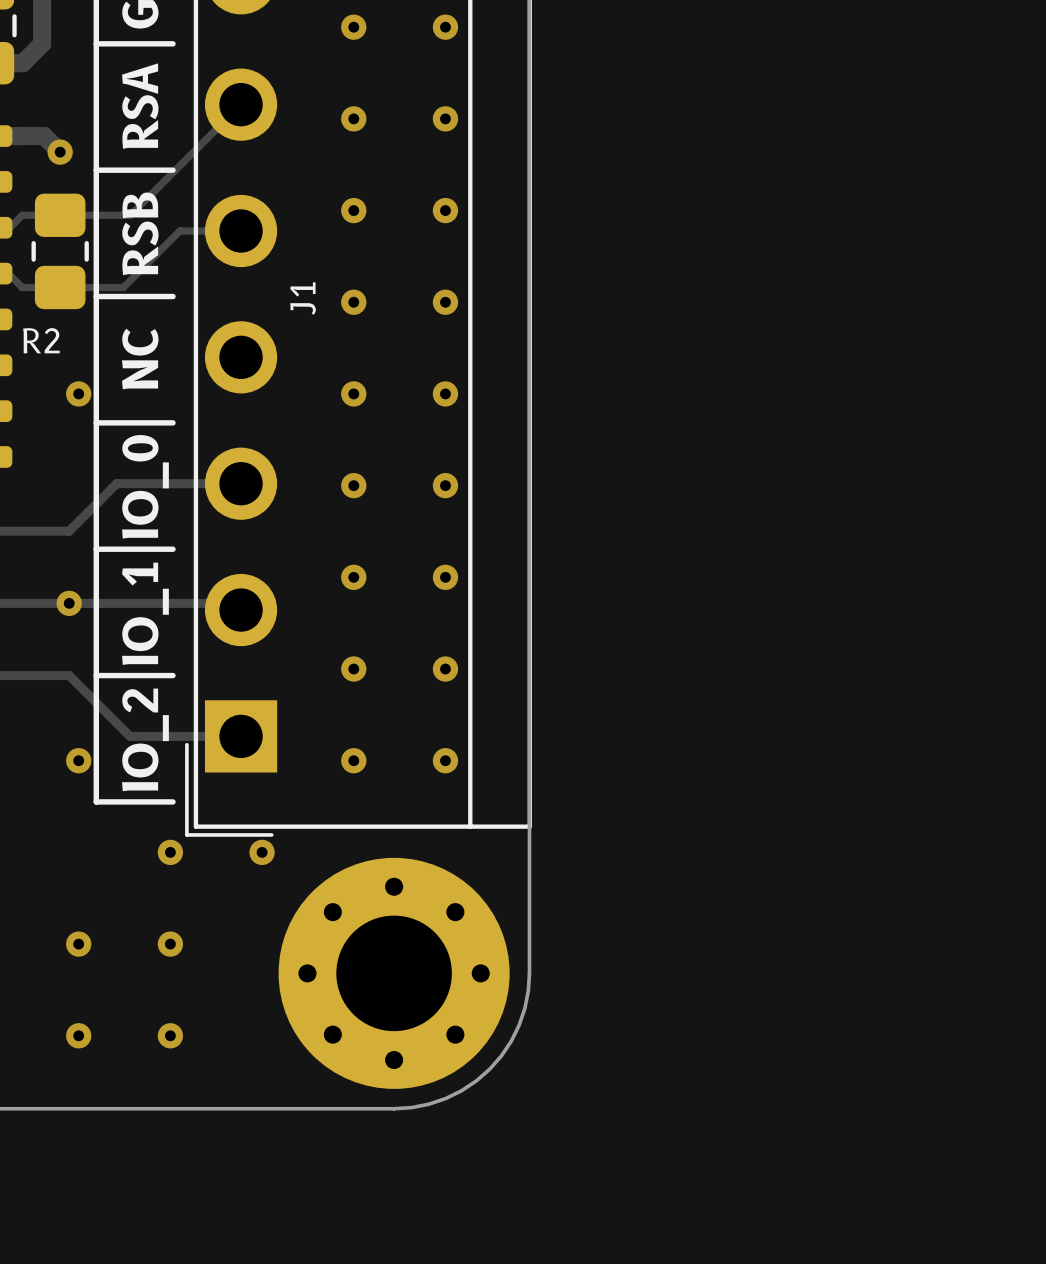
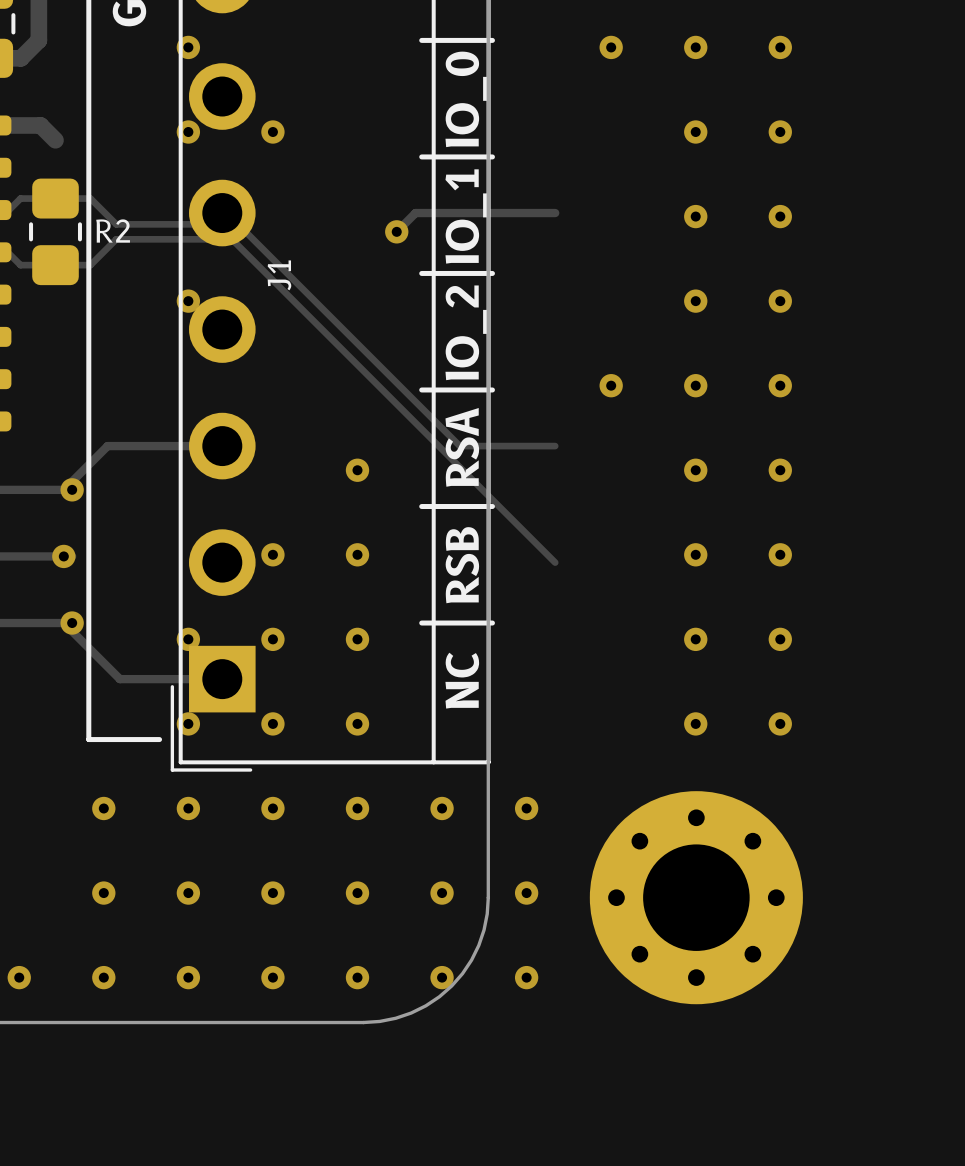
via: (353, 27) -> none
via: (445, 27) -> none
line: (96, 43) (173, 43) -> (421, 40) (492, 40)
via: none -> (188, 47)
via: none -> (611, 47)
via: none -> (695, 47)
via: none -> (780, 47)
track: (241, 104) (130, 215) (98, 215) -> (555, 446) (459, 446) (238, 224) (116, 224) (90, 198)
text position: RSA (140, 106) -> RSA (462, 447)
via: (353, 118) -> none
via: (445, 118) -> none
via: none -> (188, 132)
via: none -> (272, 132)
via: none -> (695, 132)
via: none -> (780, 132)
via: (60, 152) -> none
line: (96, 170) (173, 170) -> (421, 156) (492, 156)
via: (353, 210) -> none
via: (445, 210) -> none
track: (241, 231) (179, 231) (123, 287) (98, 287) -> (555, 562) (231, 239) (116, 239) (90, 265)
track: none -> (555, 213) (415, 213) (396, 231)
text position: RSB (140, 233) -> RSB (462, 565)
via: none -> (695, 216)
via: none -> (780, 216)
via: none -> (396, 231)
line: (96, 296) (173, 296) -> (421, 273) (492, 273)
via: (353, 302) -> none
via: (445, 302) -> none
via: none -> (188, 301)
via: none -> (695, 301)
via: none -> (780, 301)
R2 name position: R2 (41, 340) -> R2 (113, 231)
text position: NC (140, 359) -> NC (462, 680)
via: (78, 393) -> none
via: (353, 393) -> none
via: (445, 393) -> none
via: none -> (611, 385)
via: none -> (695, 385)
via: none -> (780, 385)
line: (96, 422) (173, 422) -> (421, 389) (492, 389)
via: (353, 485) -> none
via: (445, 485) -> none
text position: IO_0 (145, 486) -> IO_0 (467, 99)
via: none -> (357, 470)
via: none -> (695, 470)
via: none -> (780, 470)
via: none -> (72, 489)
line: (96, 549) (173, 549) -> (421, 506) (492, 506)
via: (353, 577) -> none
via: (445, 577) -> none
via: none -> (272, 554)
via: none -> (357, 554)
via: none -> (695, 554)
via: none -> (780, 554)
track: (78, 603) (234, 603) (241, 610) -> none
text position: IO_1 (145, 613) -> IO_1 (467, 216)
via: (353, 669) -> none
via: (445, 669) -> none
via: none -> (72, 623)
line: (96, 675) (173, 675) -> (421, 623) (492, 623)
via: none -> (188, 639)
via: none -> (272, 639)
via: none -> (357, 639)
via: none -> (695, 639)
via: none -> (780, 639)
text position: IO_2 (145, 739) -> IO_2 (467, 332)
via: (78, 760) -> none
via: (353, 760) -> none
via: (445, 760) -> none
via: none -> (188, 723)
via: none -> (272, 723)
via: none -> (357, 723)
via: none -> (695, 723)
via: none -> (780, 723)
via: (170, 852) -> none
via: (262, 852) -> none
via: none -> (103, 808)
via: none -> (188, 808)
via: none -> (272, 808)
via: none -> (357, 808)
via: none -> (442, 808)
via: none -> (526, 808)
via: (78, 944) -> none
via: (170, 944) -> none
via: none -> (103, 893)
via: none -> (188, 893)
via: none -> (272, 893)
via: none -> (357, 893)
via: none -> (442, 893)
via: none -> (526, 893)
part position: (394, 973) -> (696, 897)
via: (78, 1035) -> none
via: (170, 1035) -> none
via: none -> (19, 977)
via: none -> (103, 977)
via: none -> (188, 977)
via: none -> (272, 977)
via: none -> (357, 977)
via: none -> (442, 977)
via: none -> (526, 977)

